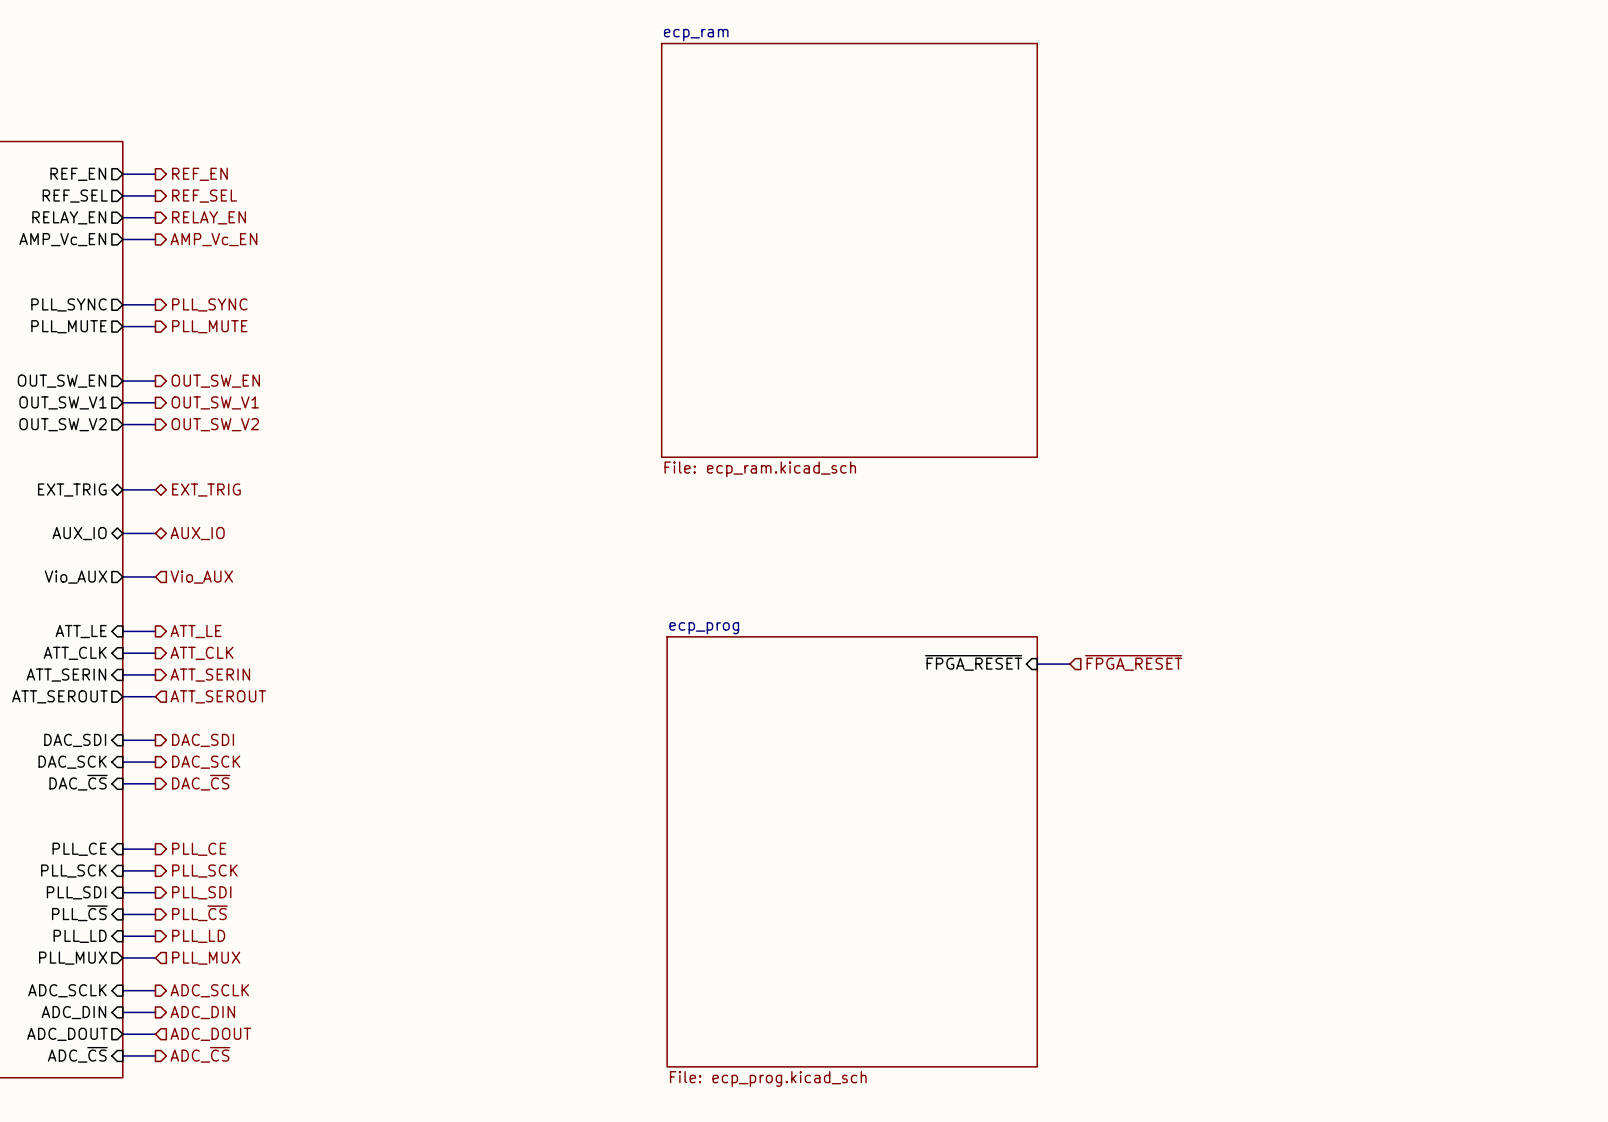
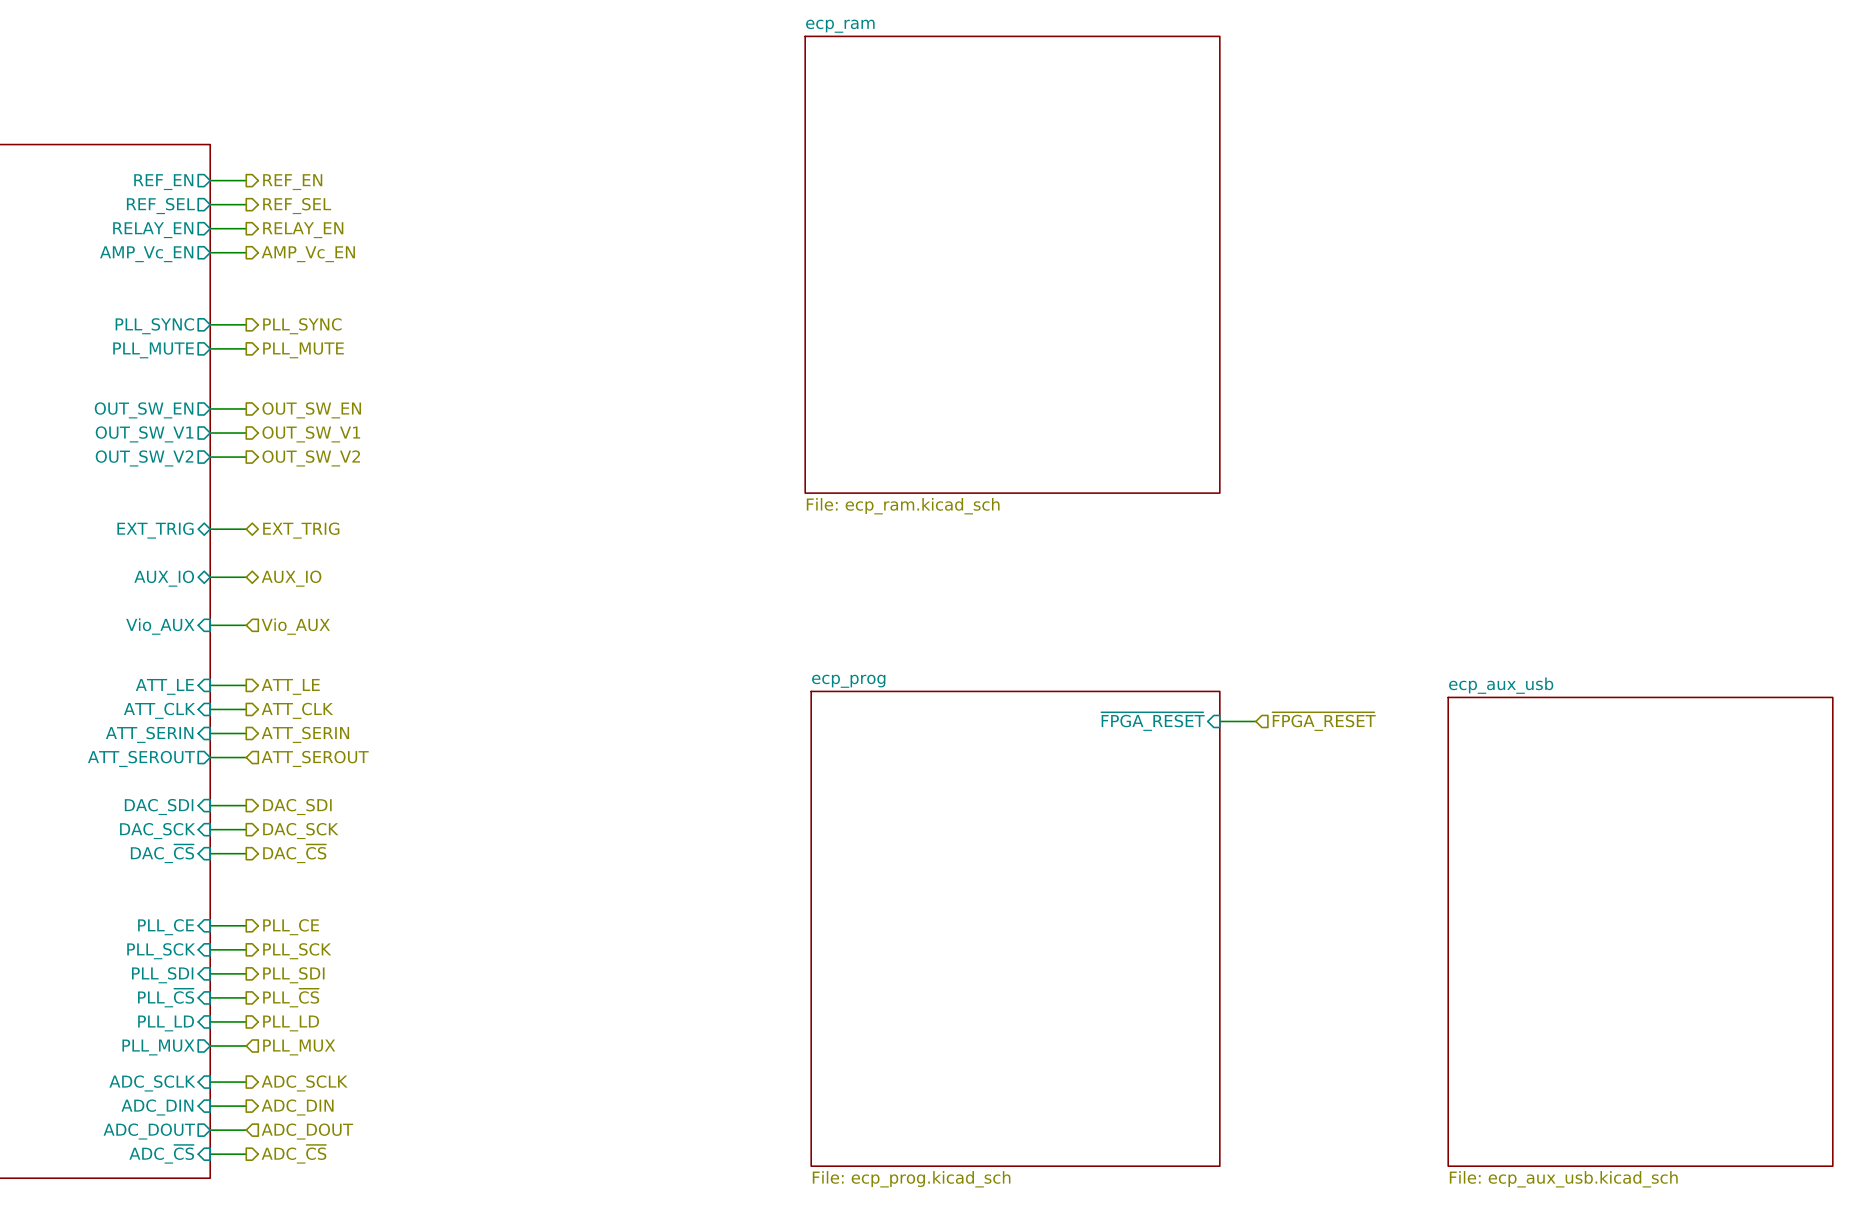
sheet pin shape: output (75, 577) -> input (160, 626)
sheet ecp_aux_usb: none -> File: ecp_aux_usb.kicad_sch (1640, 931)

